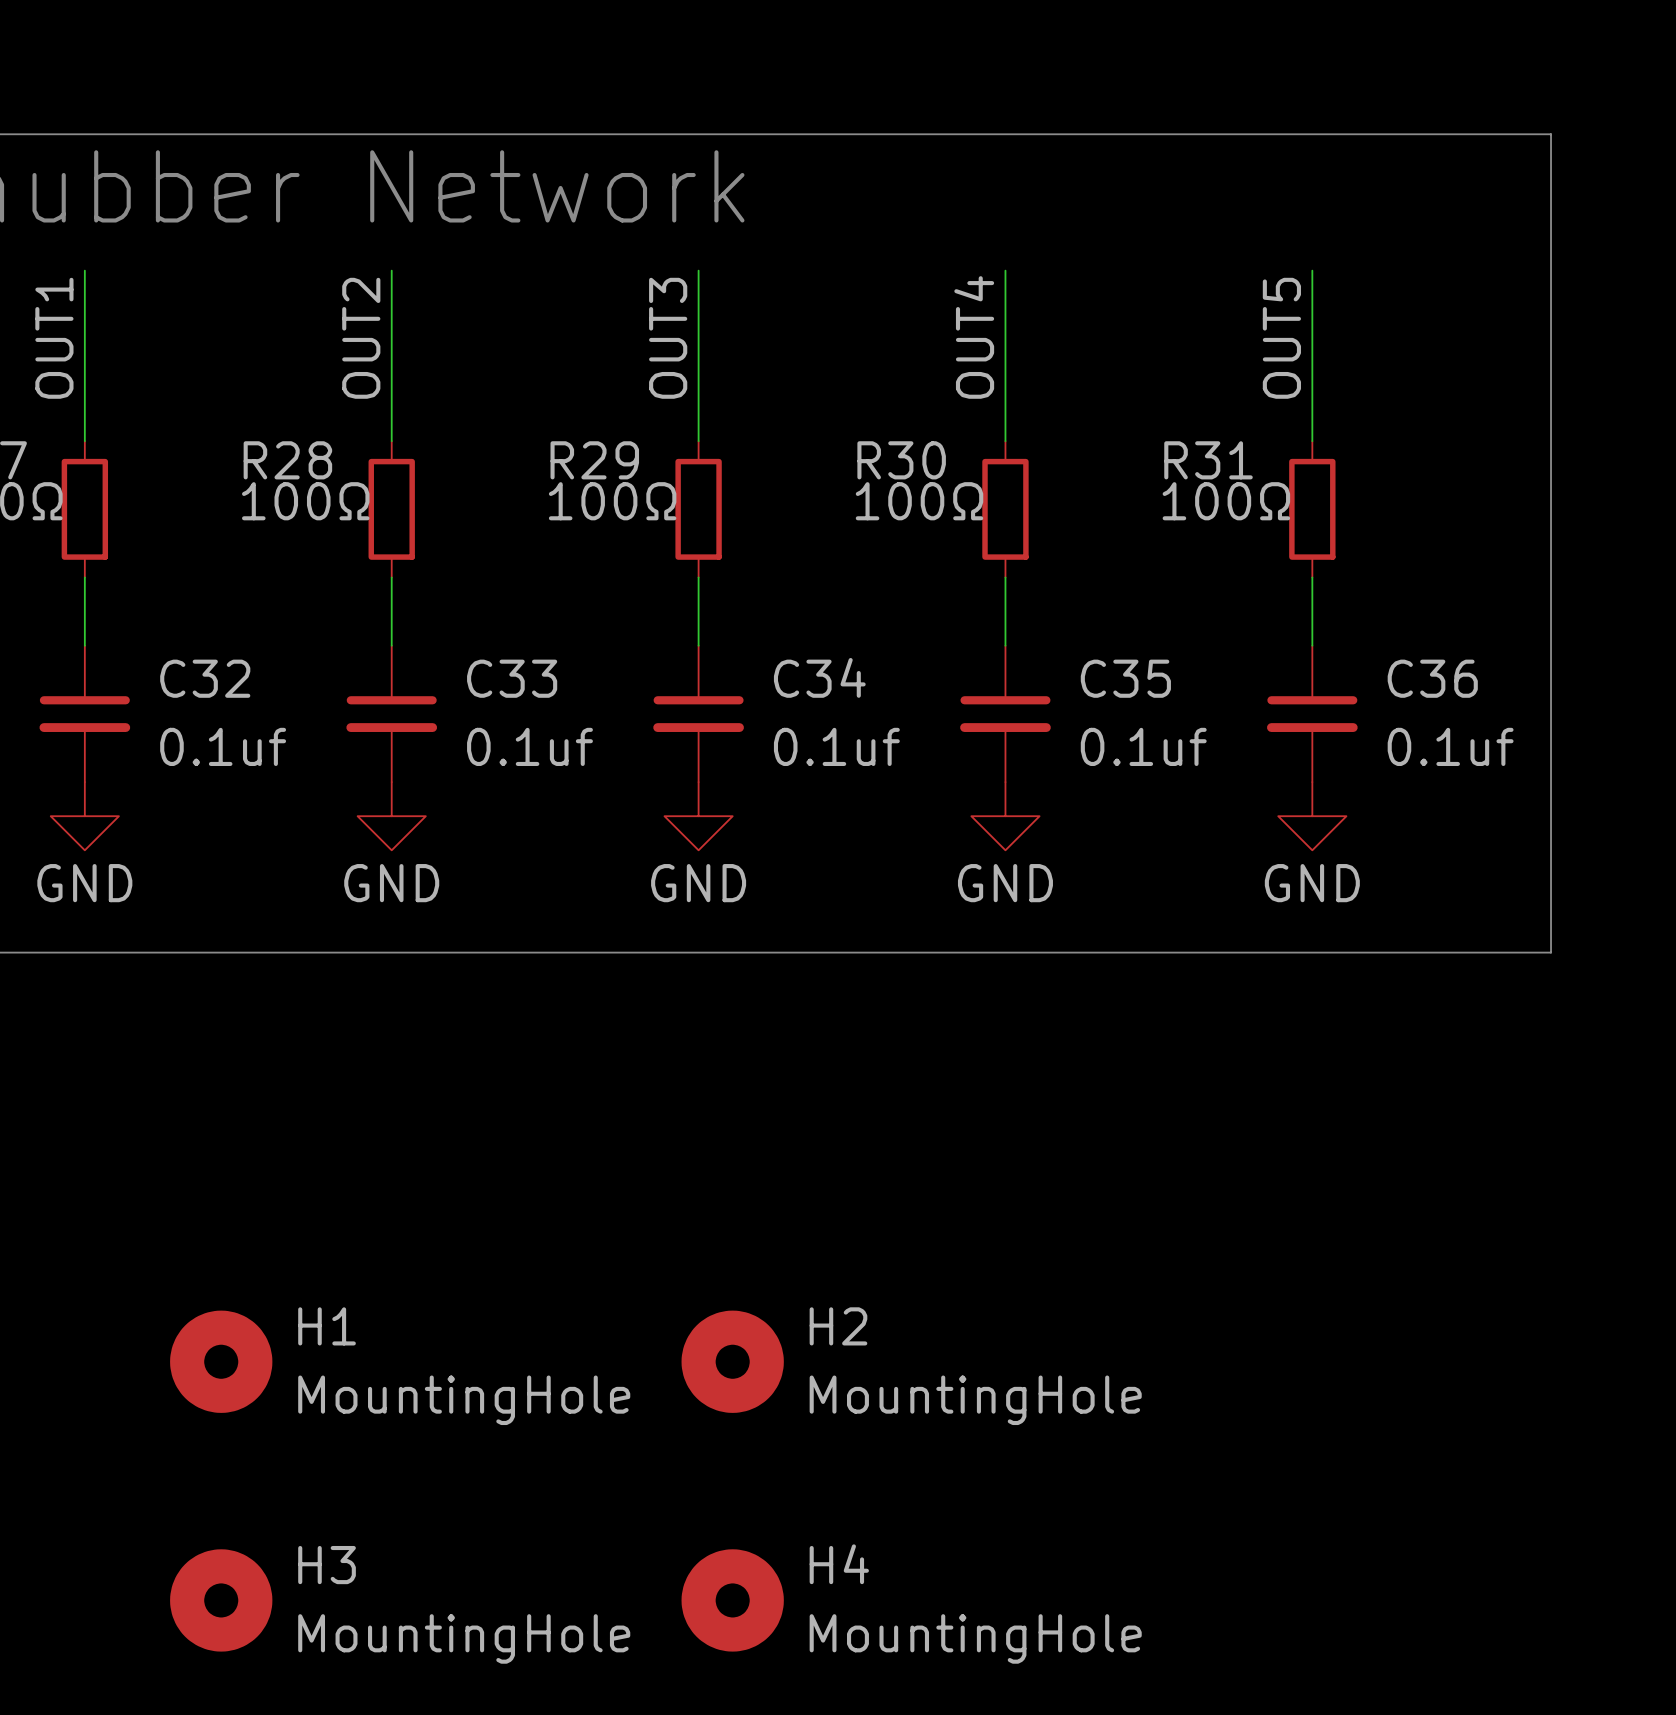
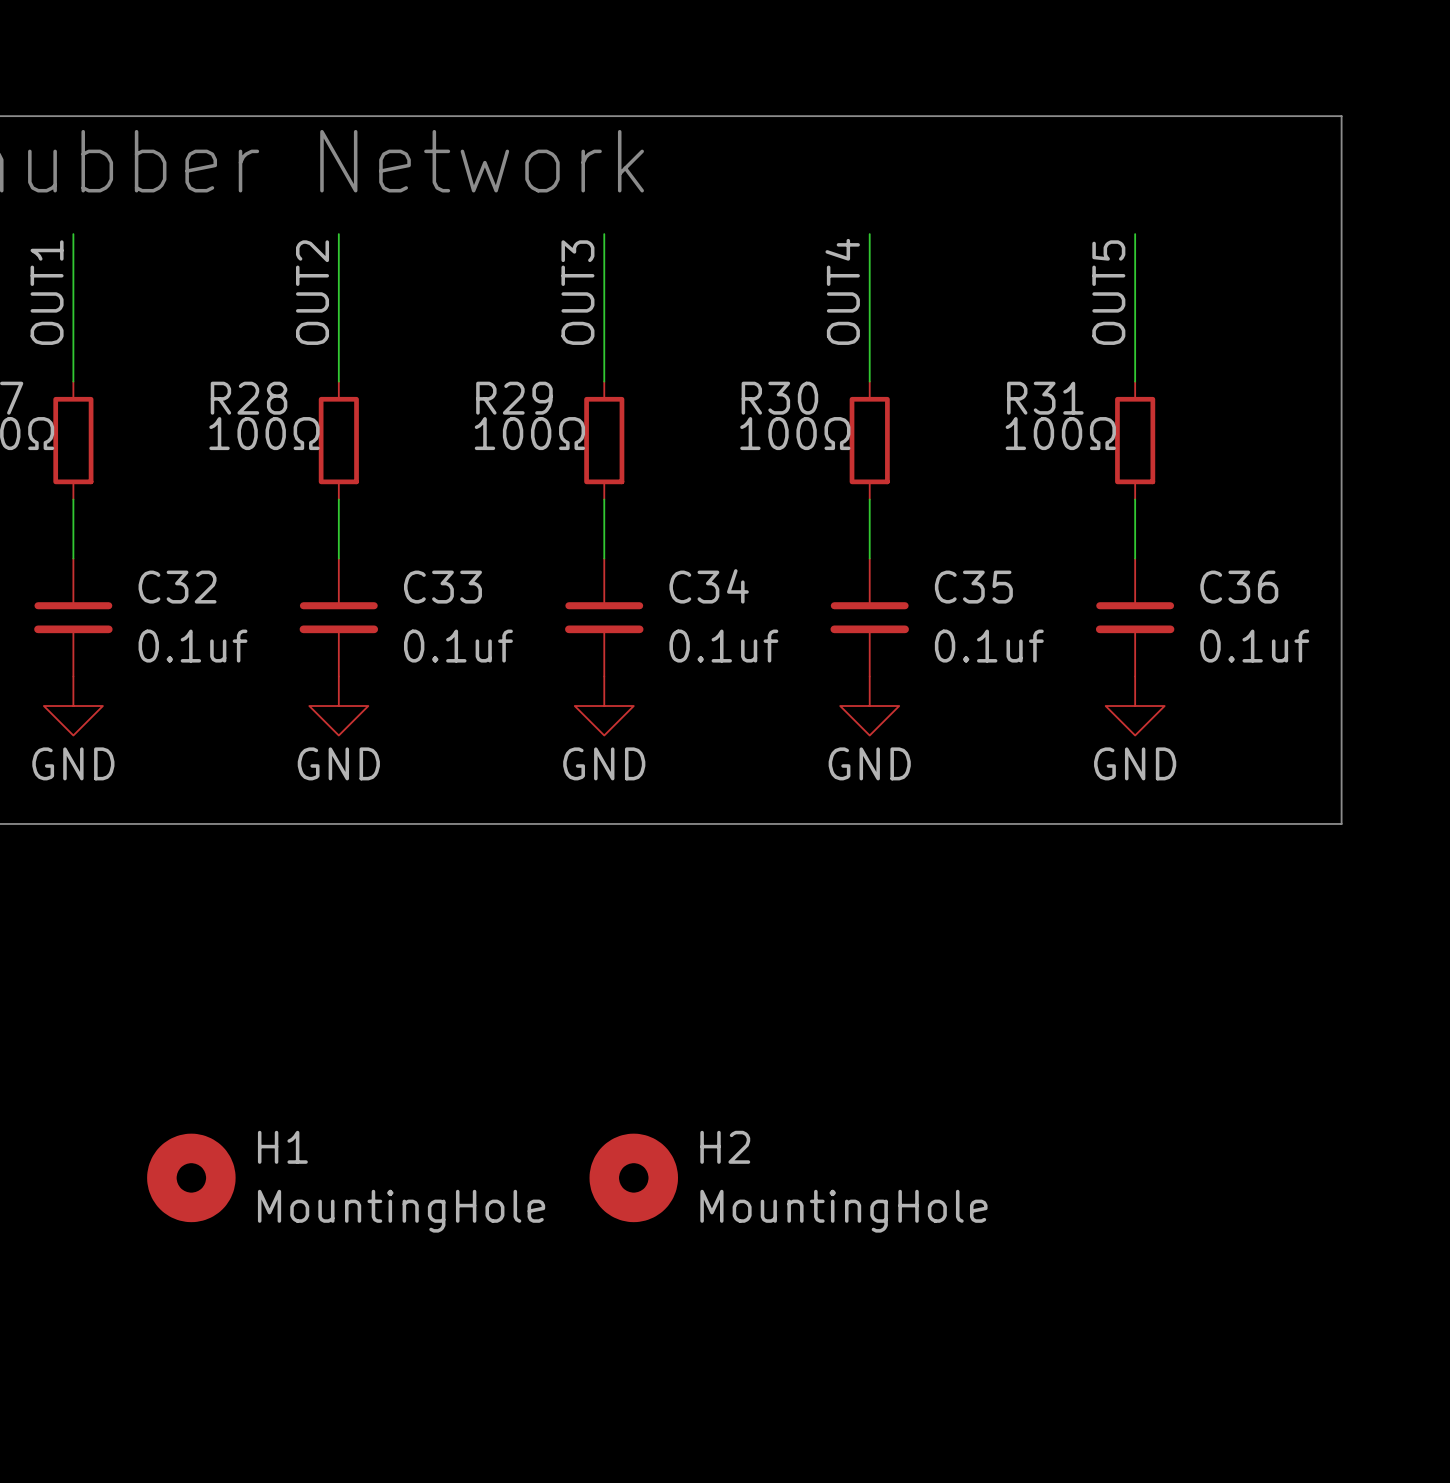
H3: MountingHole (221, 1600) -> none
H4: MountingHole (732, 1600) -> none

